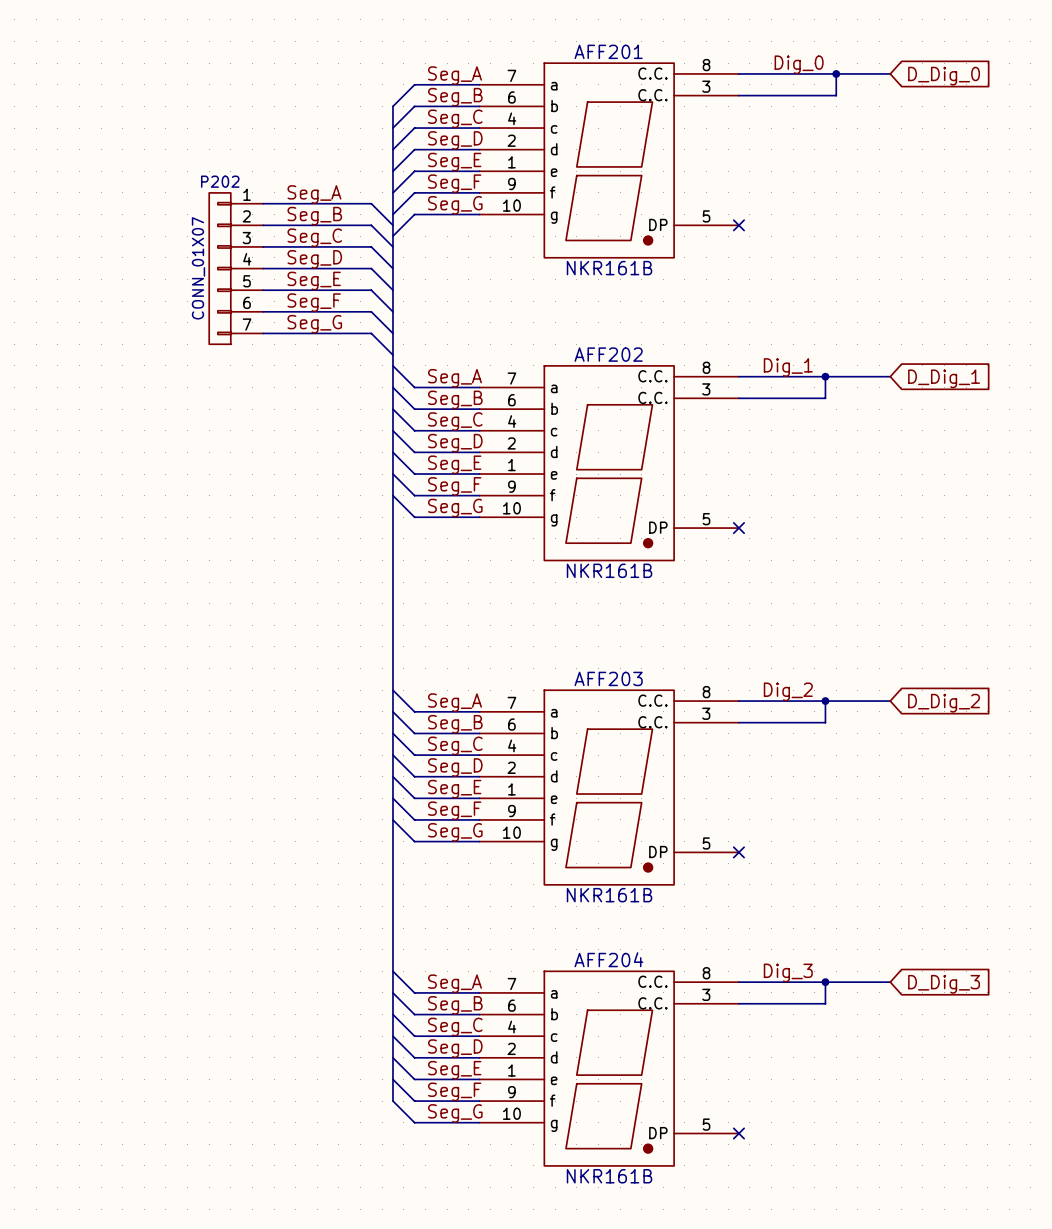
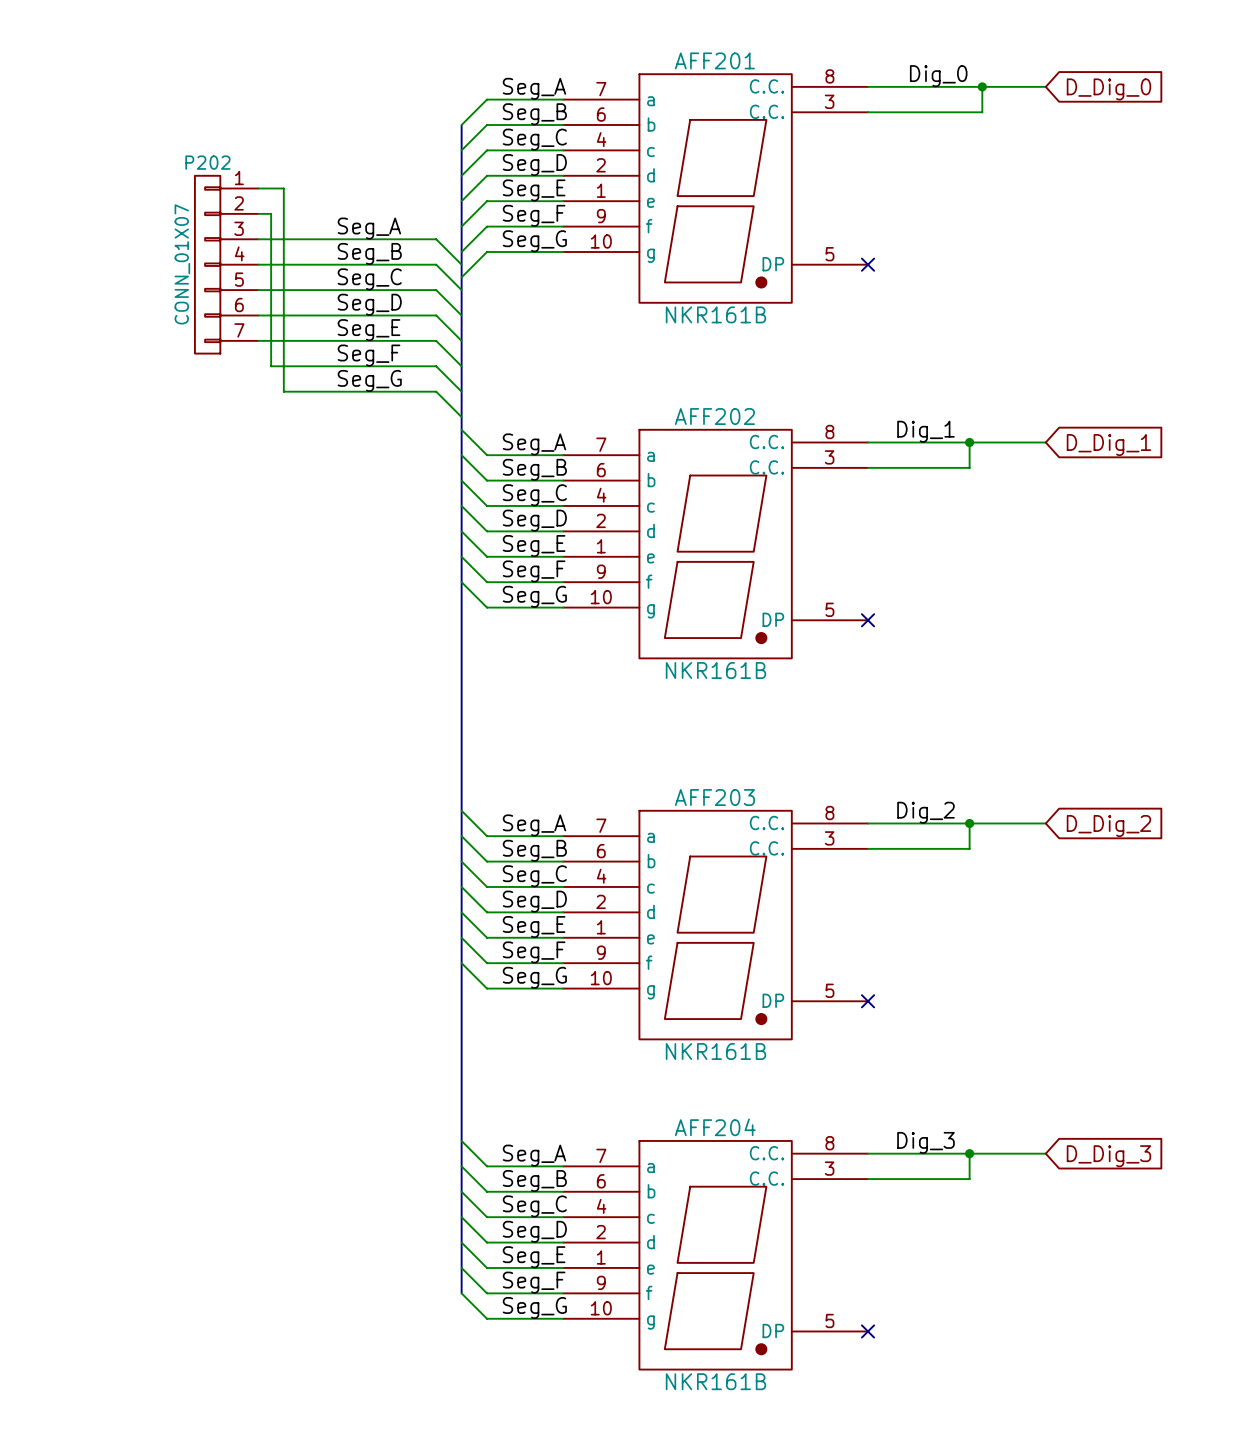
wire: none -> (258, 188) (283, 188) (283, 391) (309, 391)
P202 position: (236, 268) -> (226, 264)

